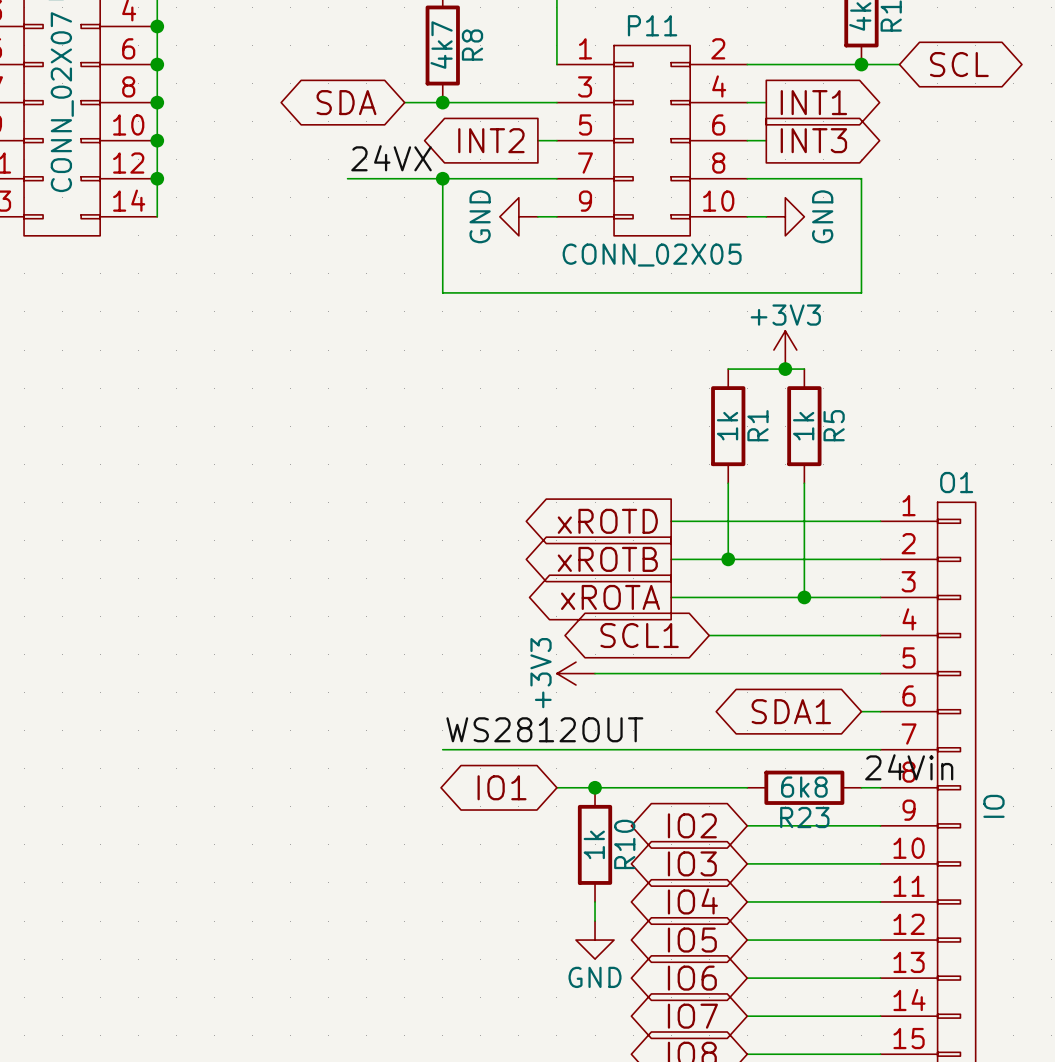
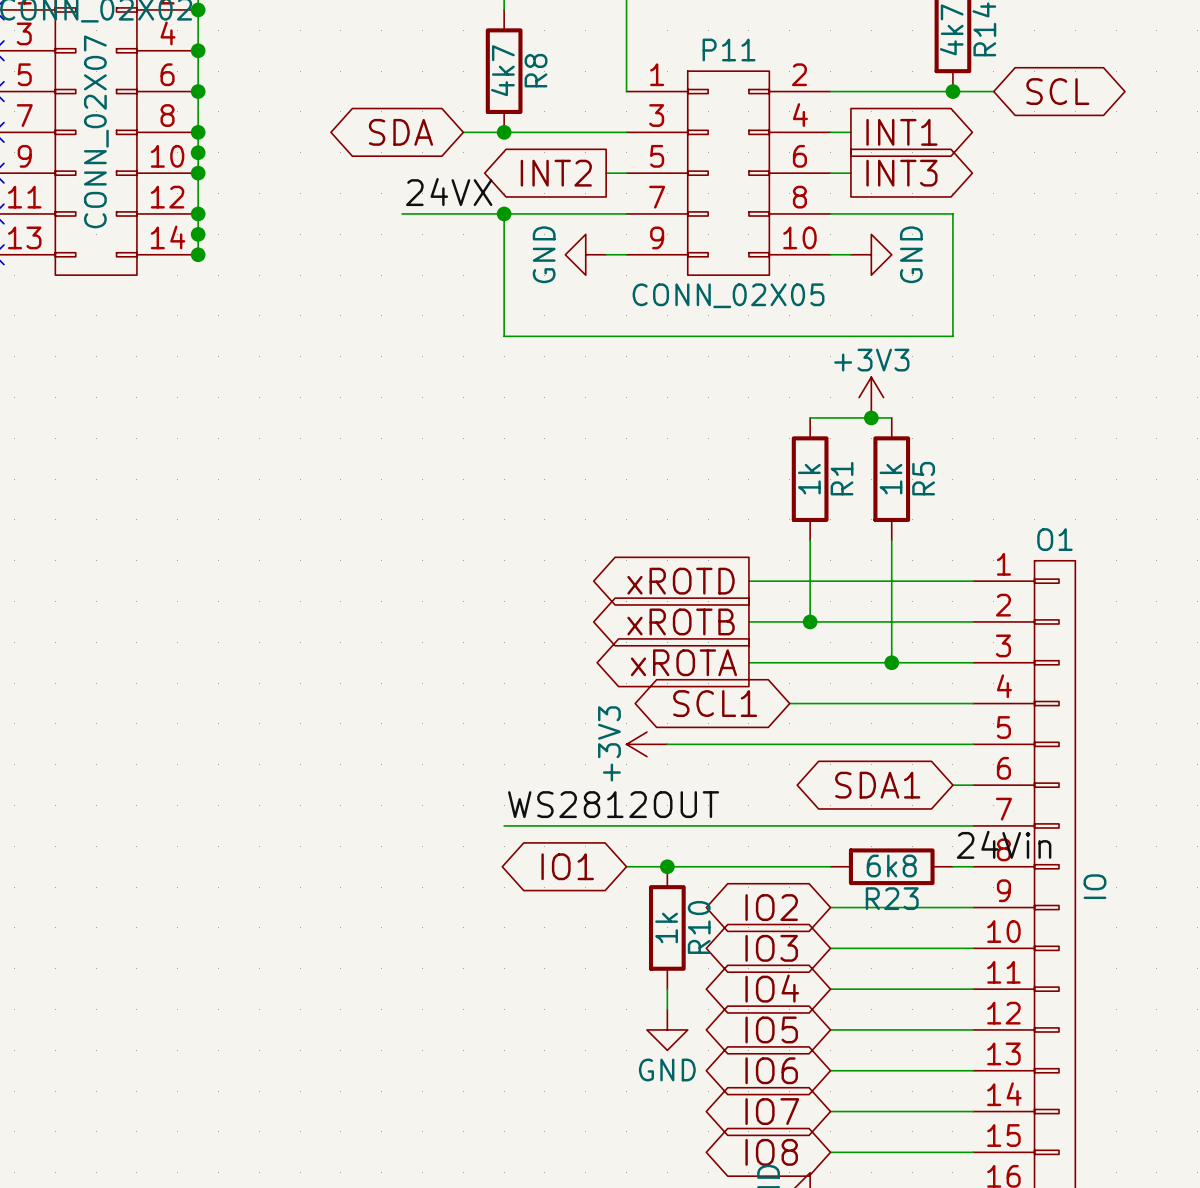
junction: none -> (198, 152)
junction: none -> (198, 234)
junction: none -> (198, 254)

